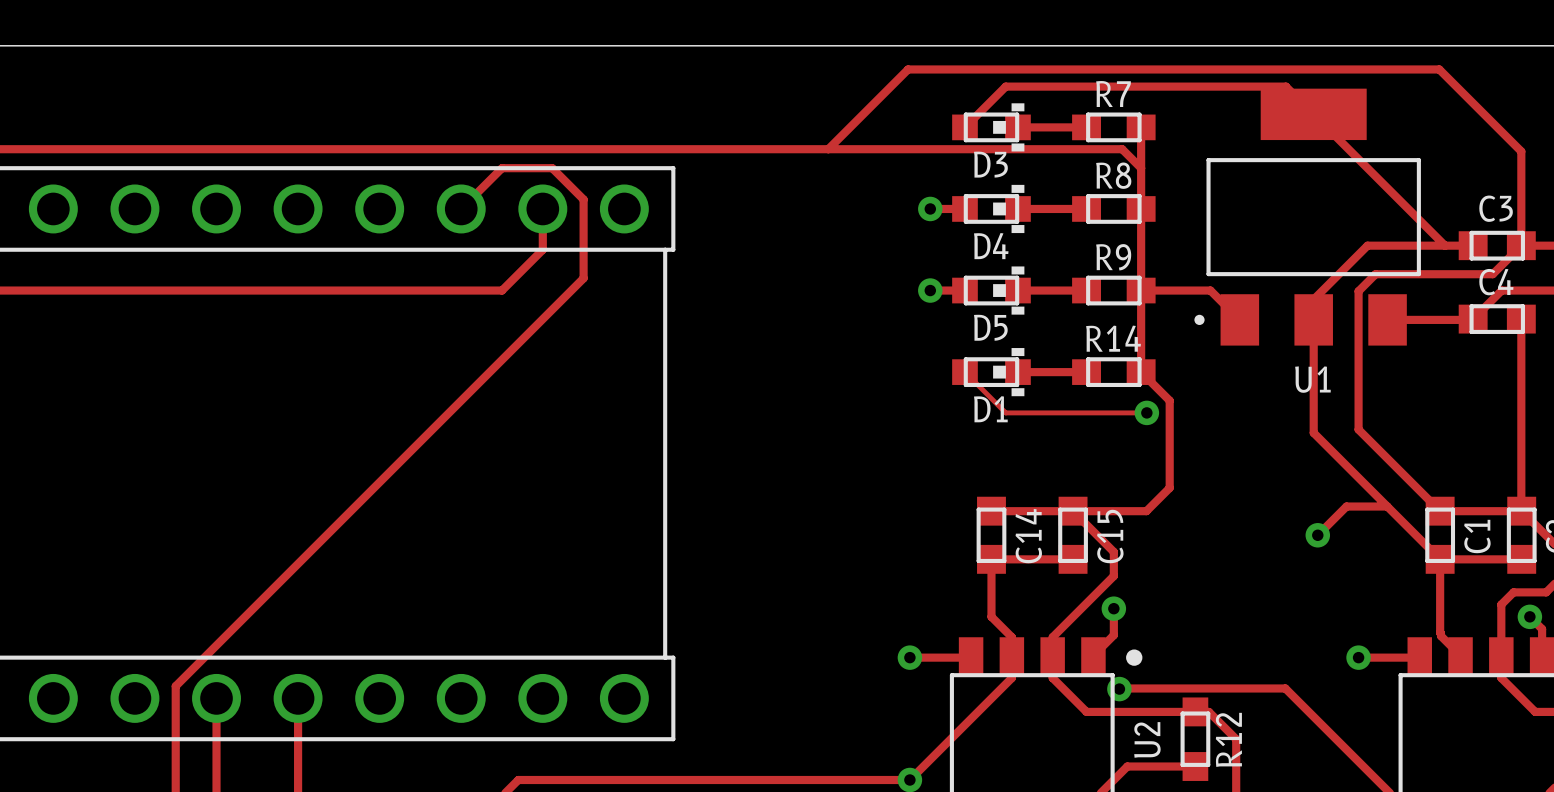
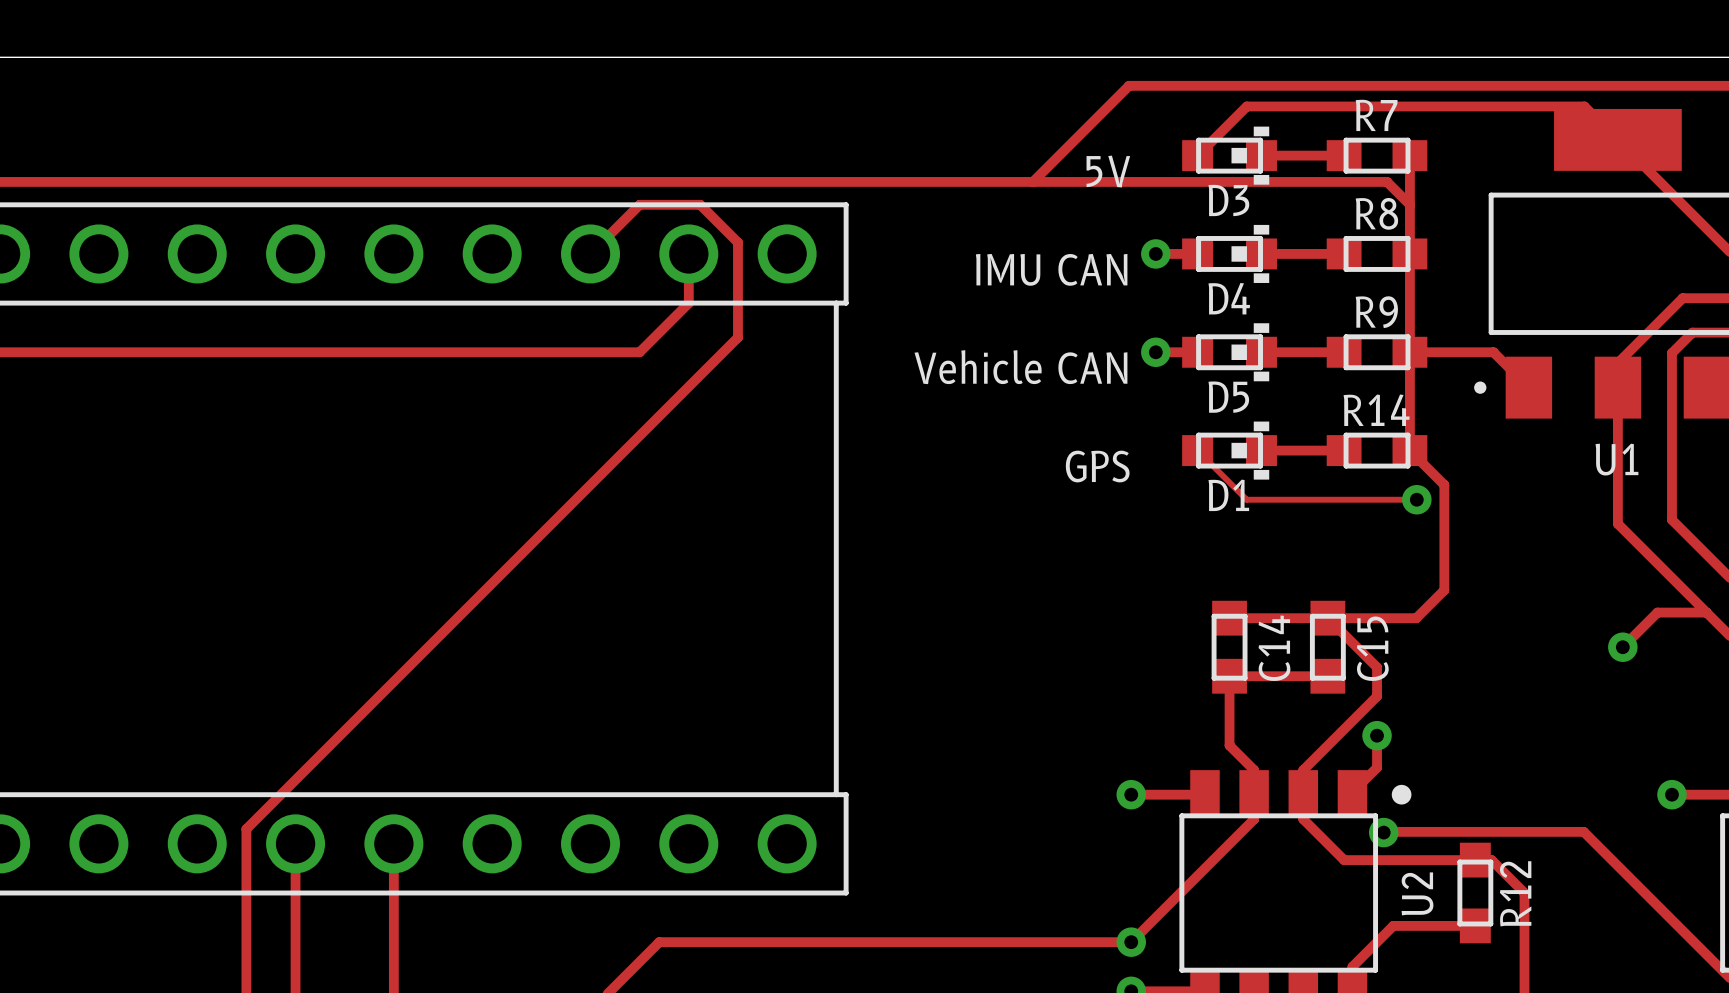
text: none -> 5V (1108, 171)
text: none -> IMU CAN (1051, 269)
text: none -> Vehicle CAN (1020, 367)
text: none -> GPS (1097, 466)

